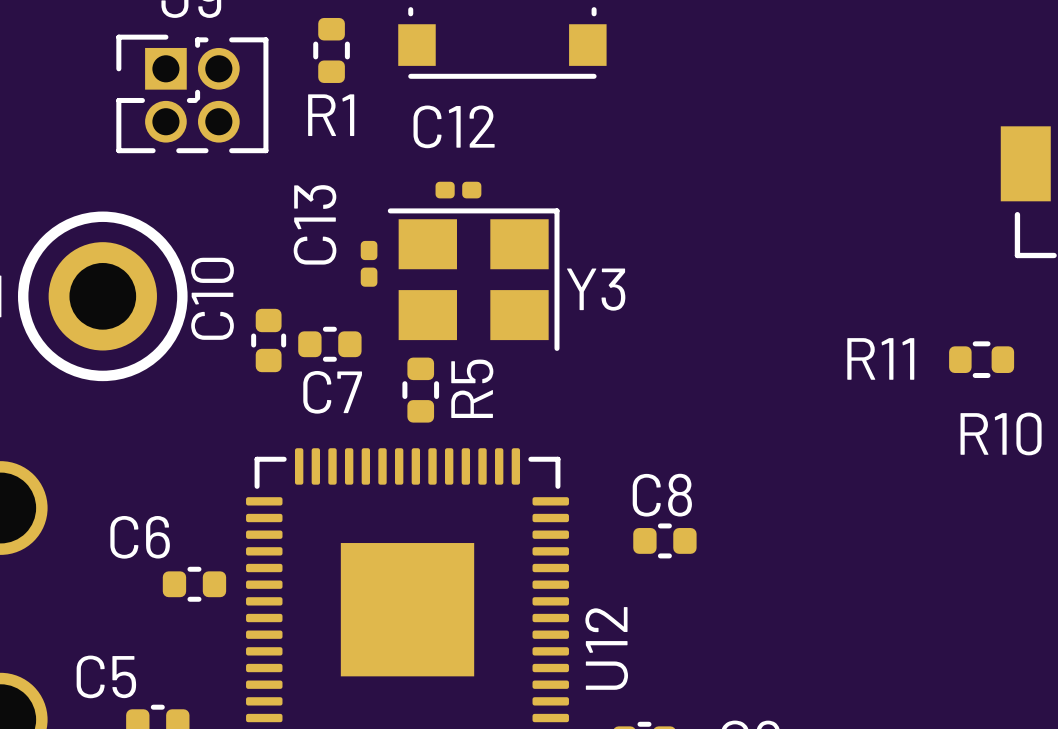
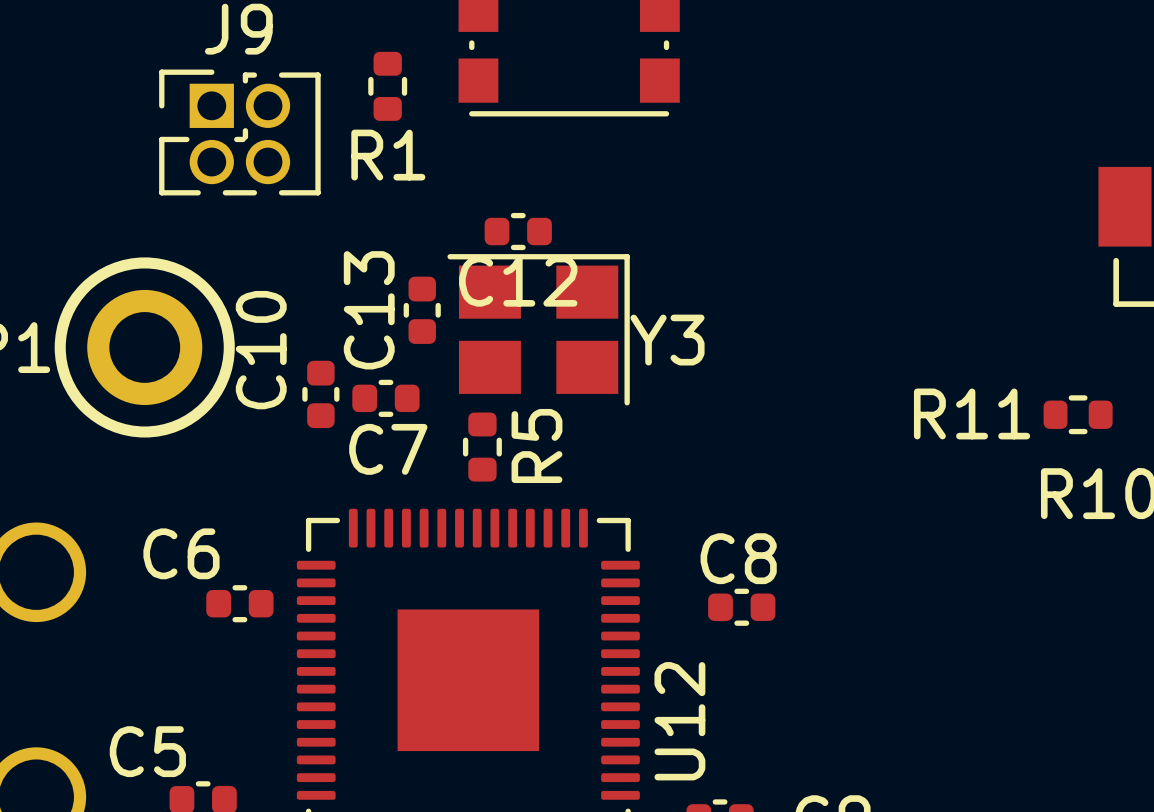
C12 name position: C12 (454, 126) -> C12 (518, 281)
C12 footprint: [435, 181, 482, 199] -> [484, 212, 552, 251]
C13 footprint: [360, 240, 378, 287] -> [403, 276, 441, 344]
C6 position: (194, 584) -> (239, 603)

